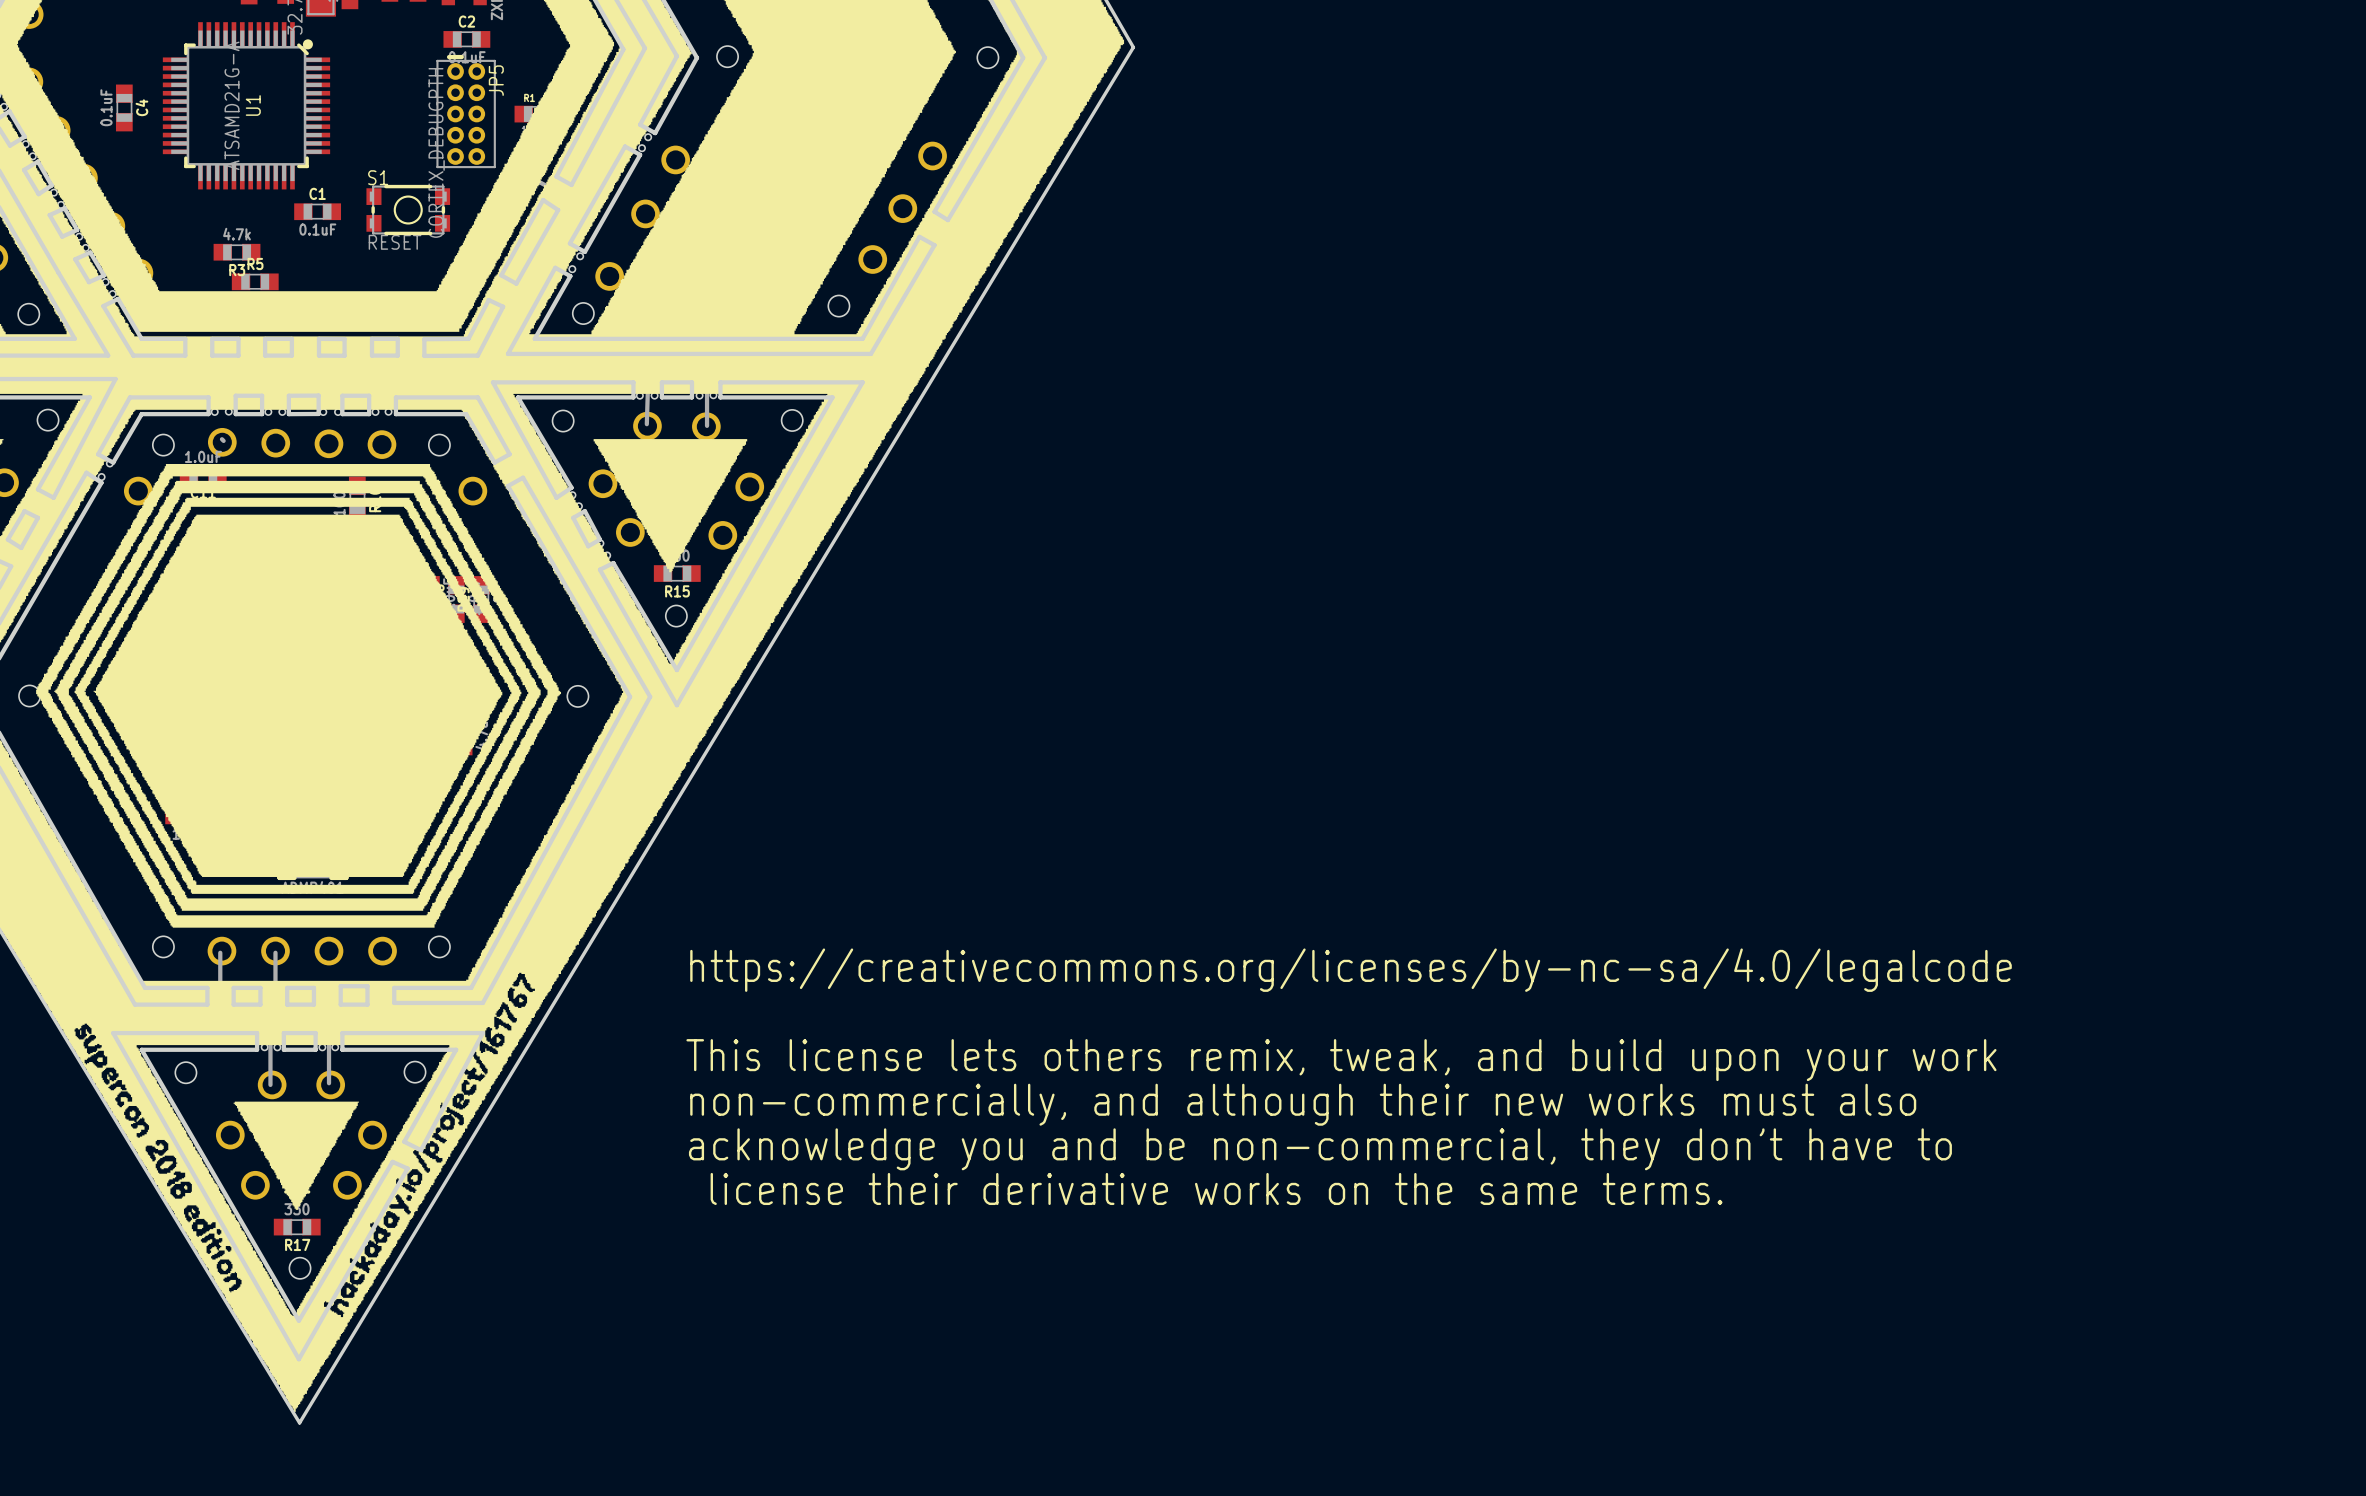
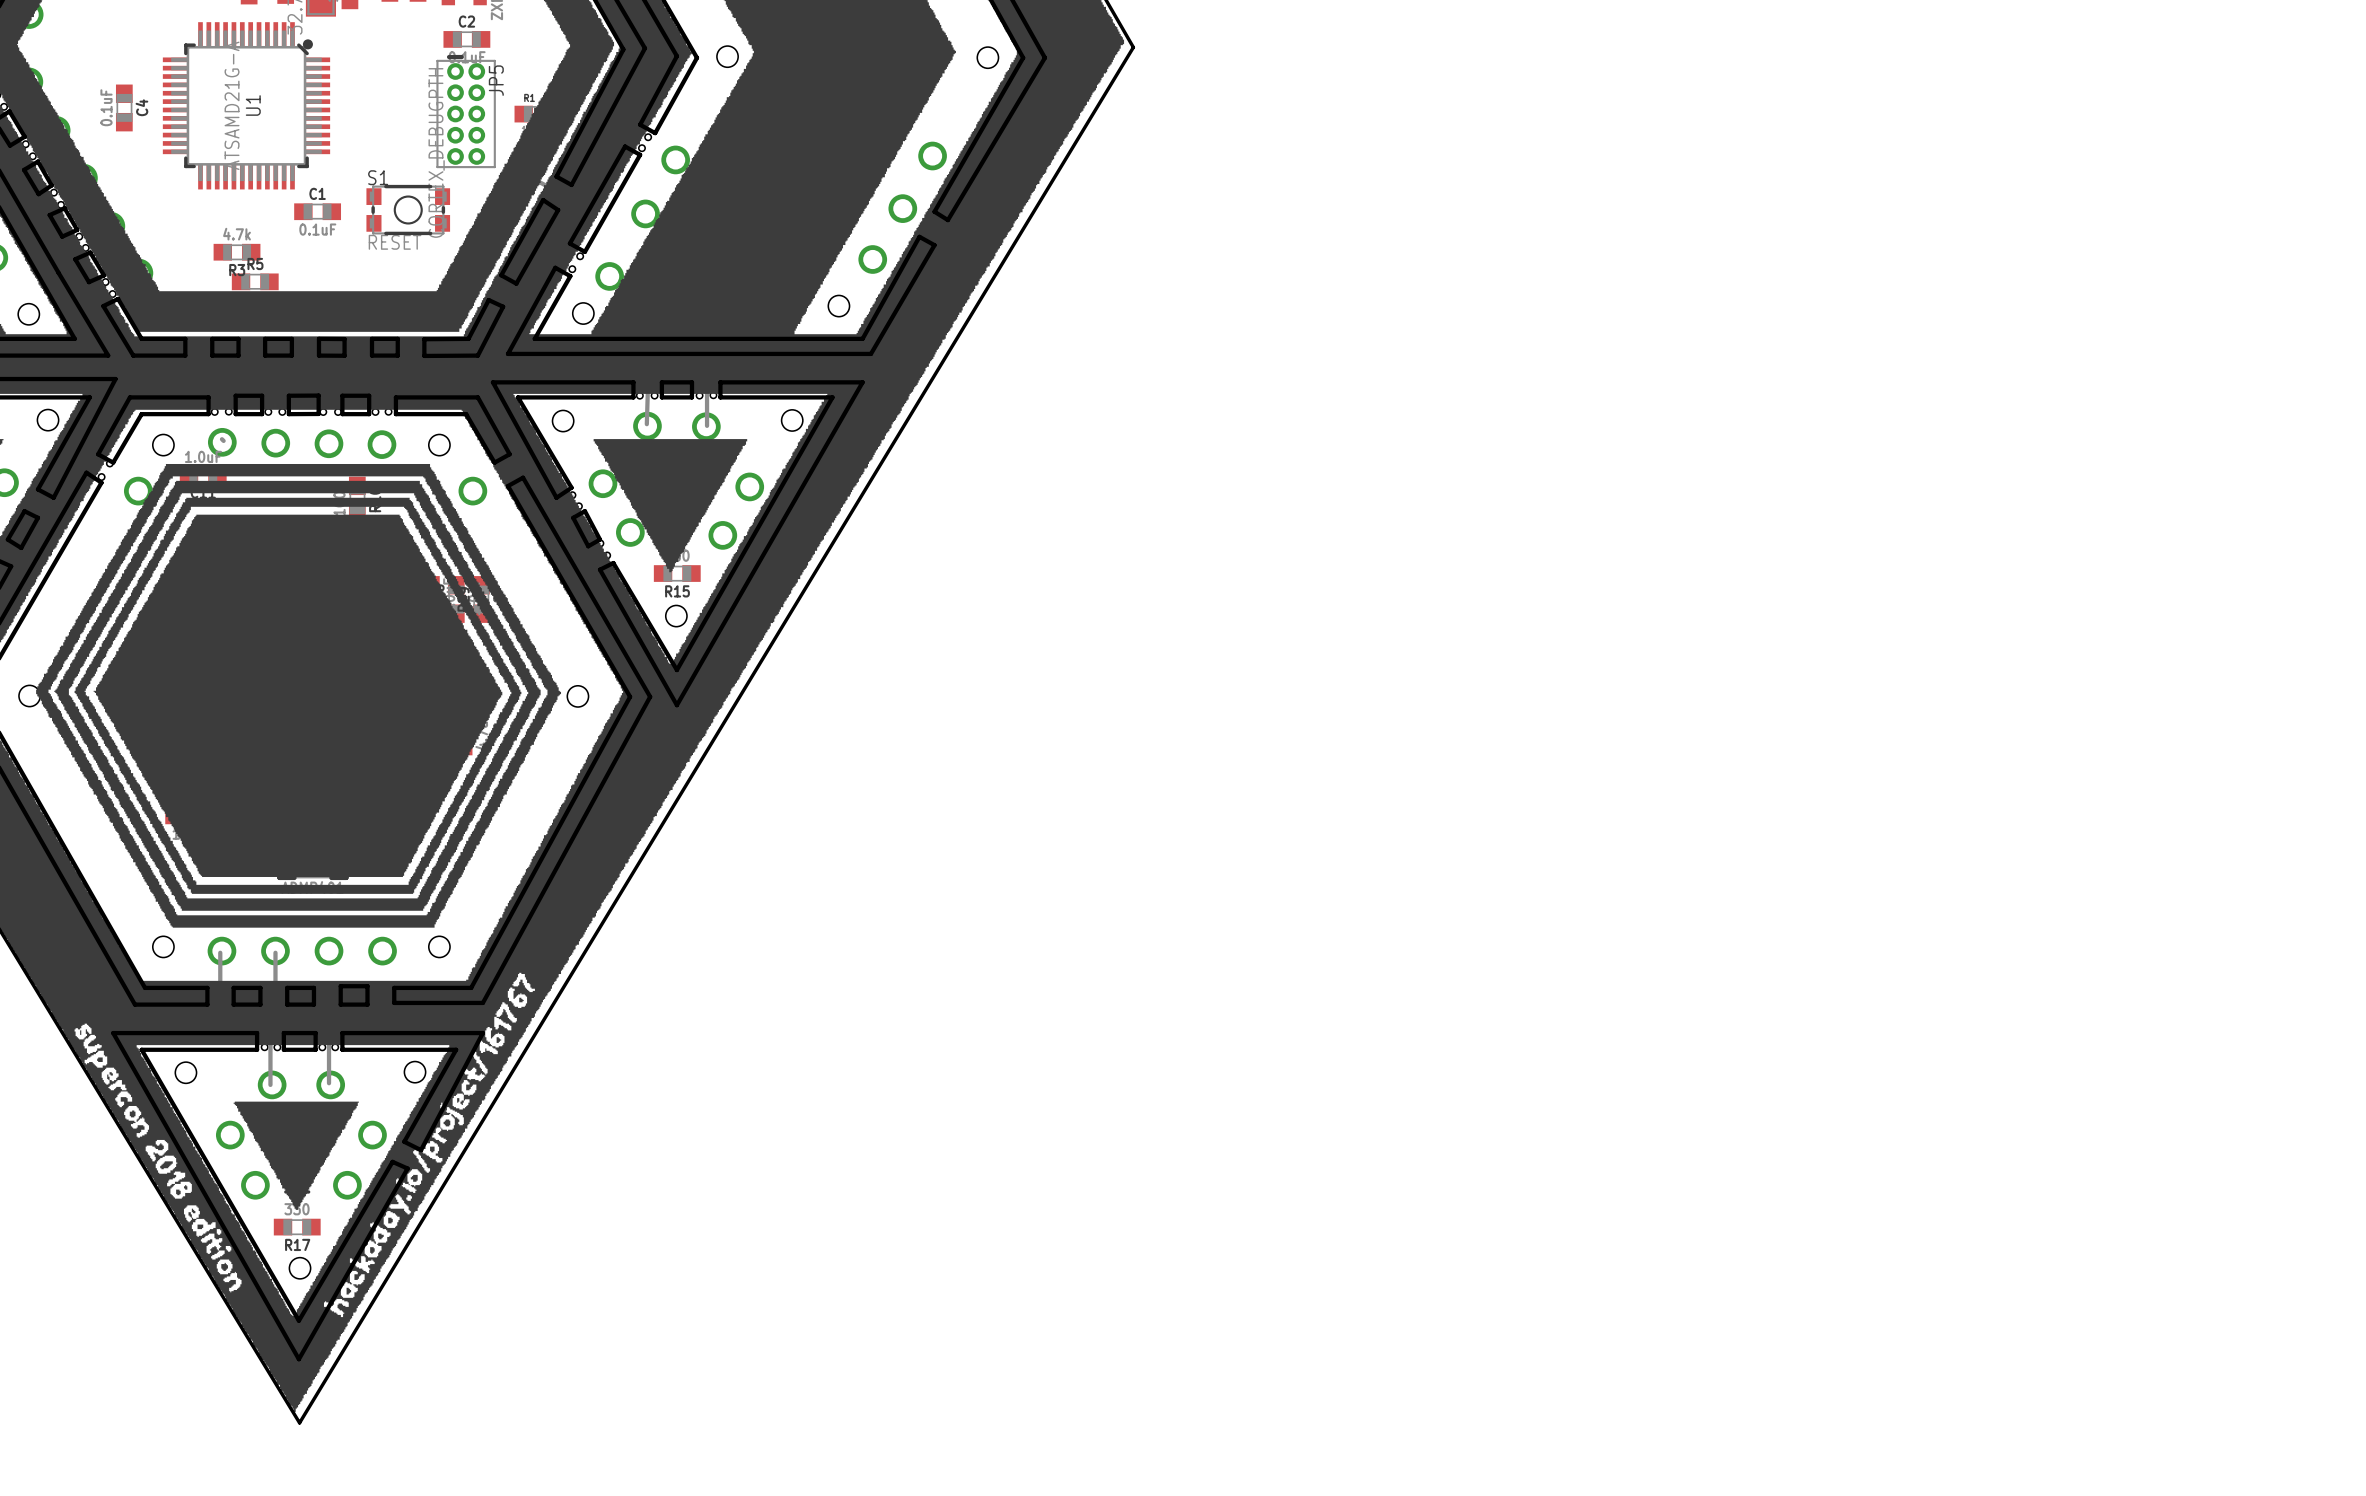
text: https://creativecommons.org/licenses/by-nc-sa/4.0/legalcode (1351, 970) -> none
text: This license lets others remix, tweak, and build upon your work (1341, 1060) -> none
text: non-commercially, and although their new works must also (1303, 1104) -> none
text: acknowledge you and be non-commercial, they don’t have to (1320, 1149) -> none
text: license their derivative works on the same terms. (1216, 1188) -> none

